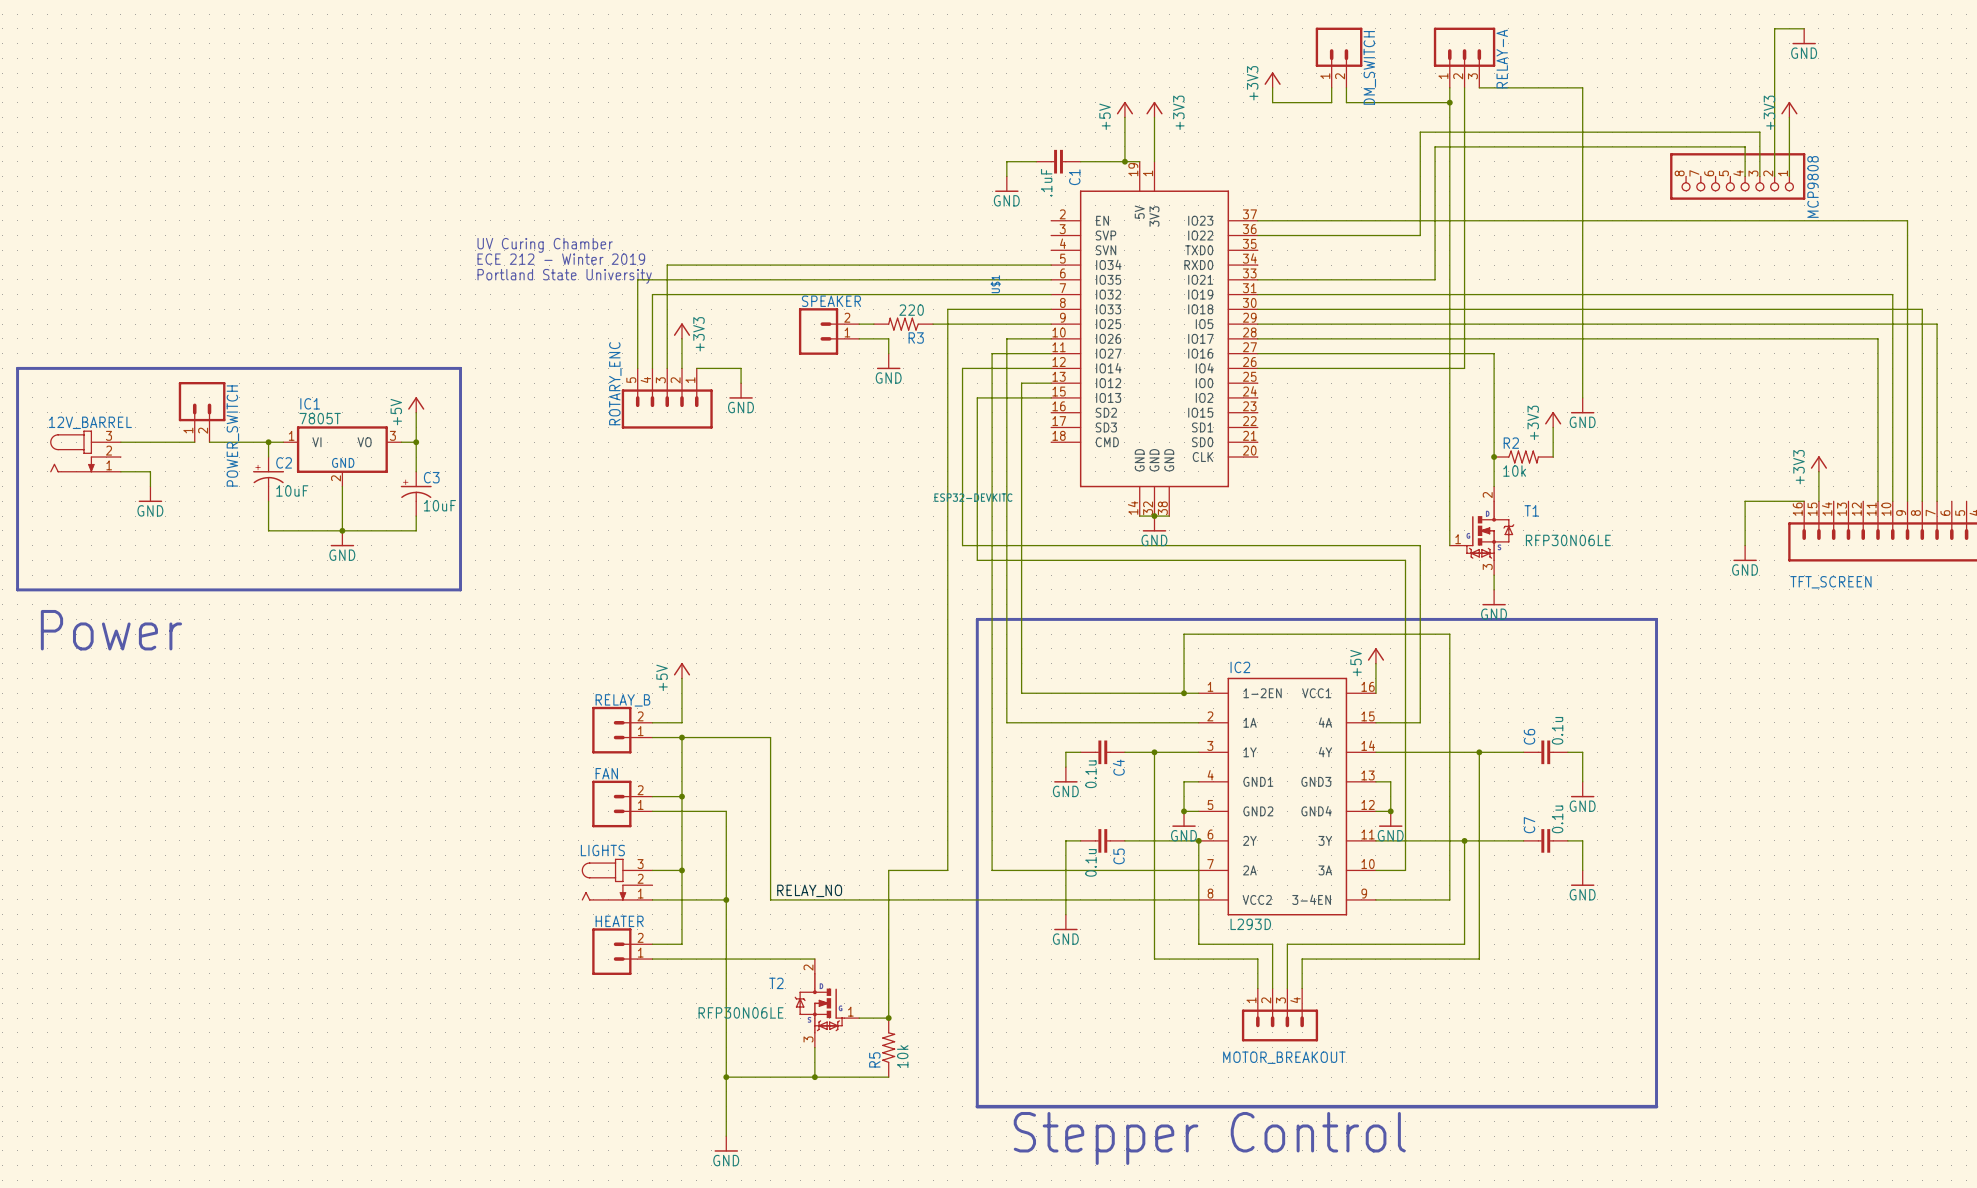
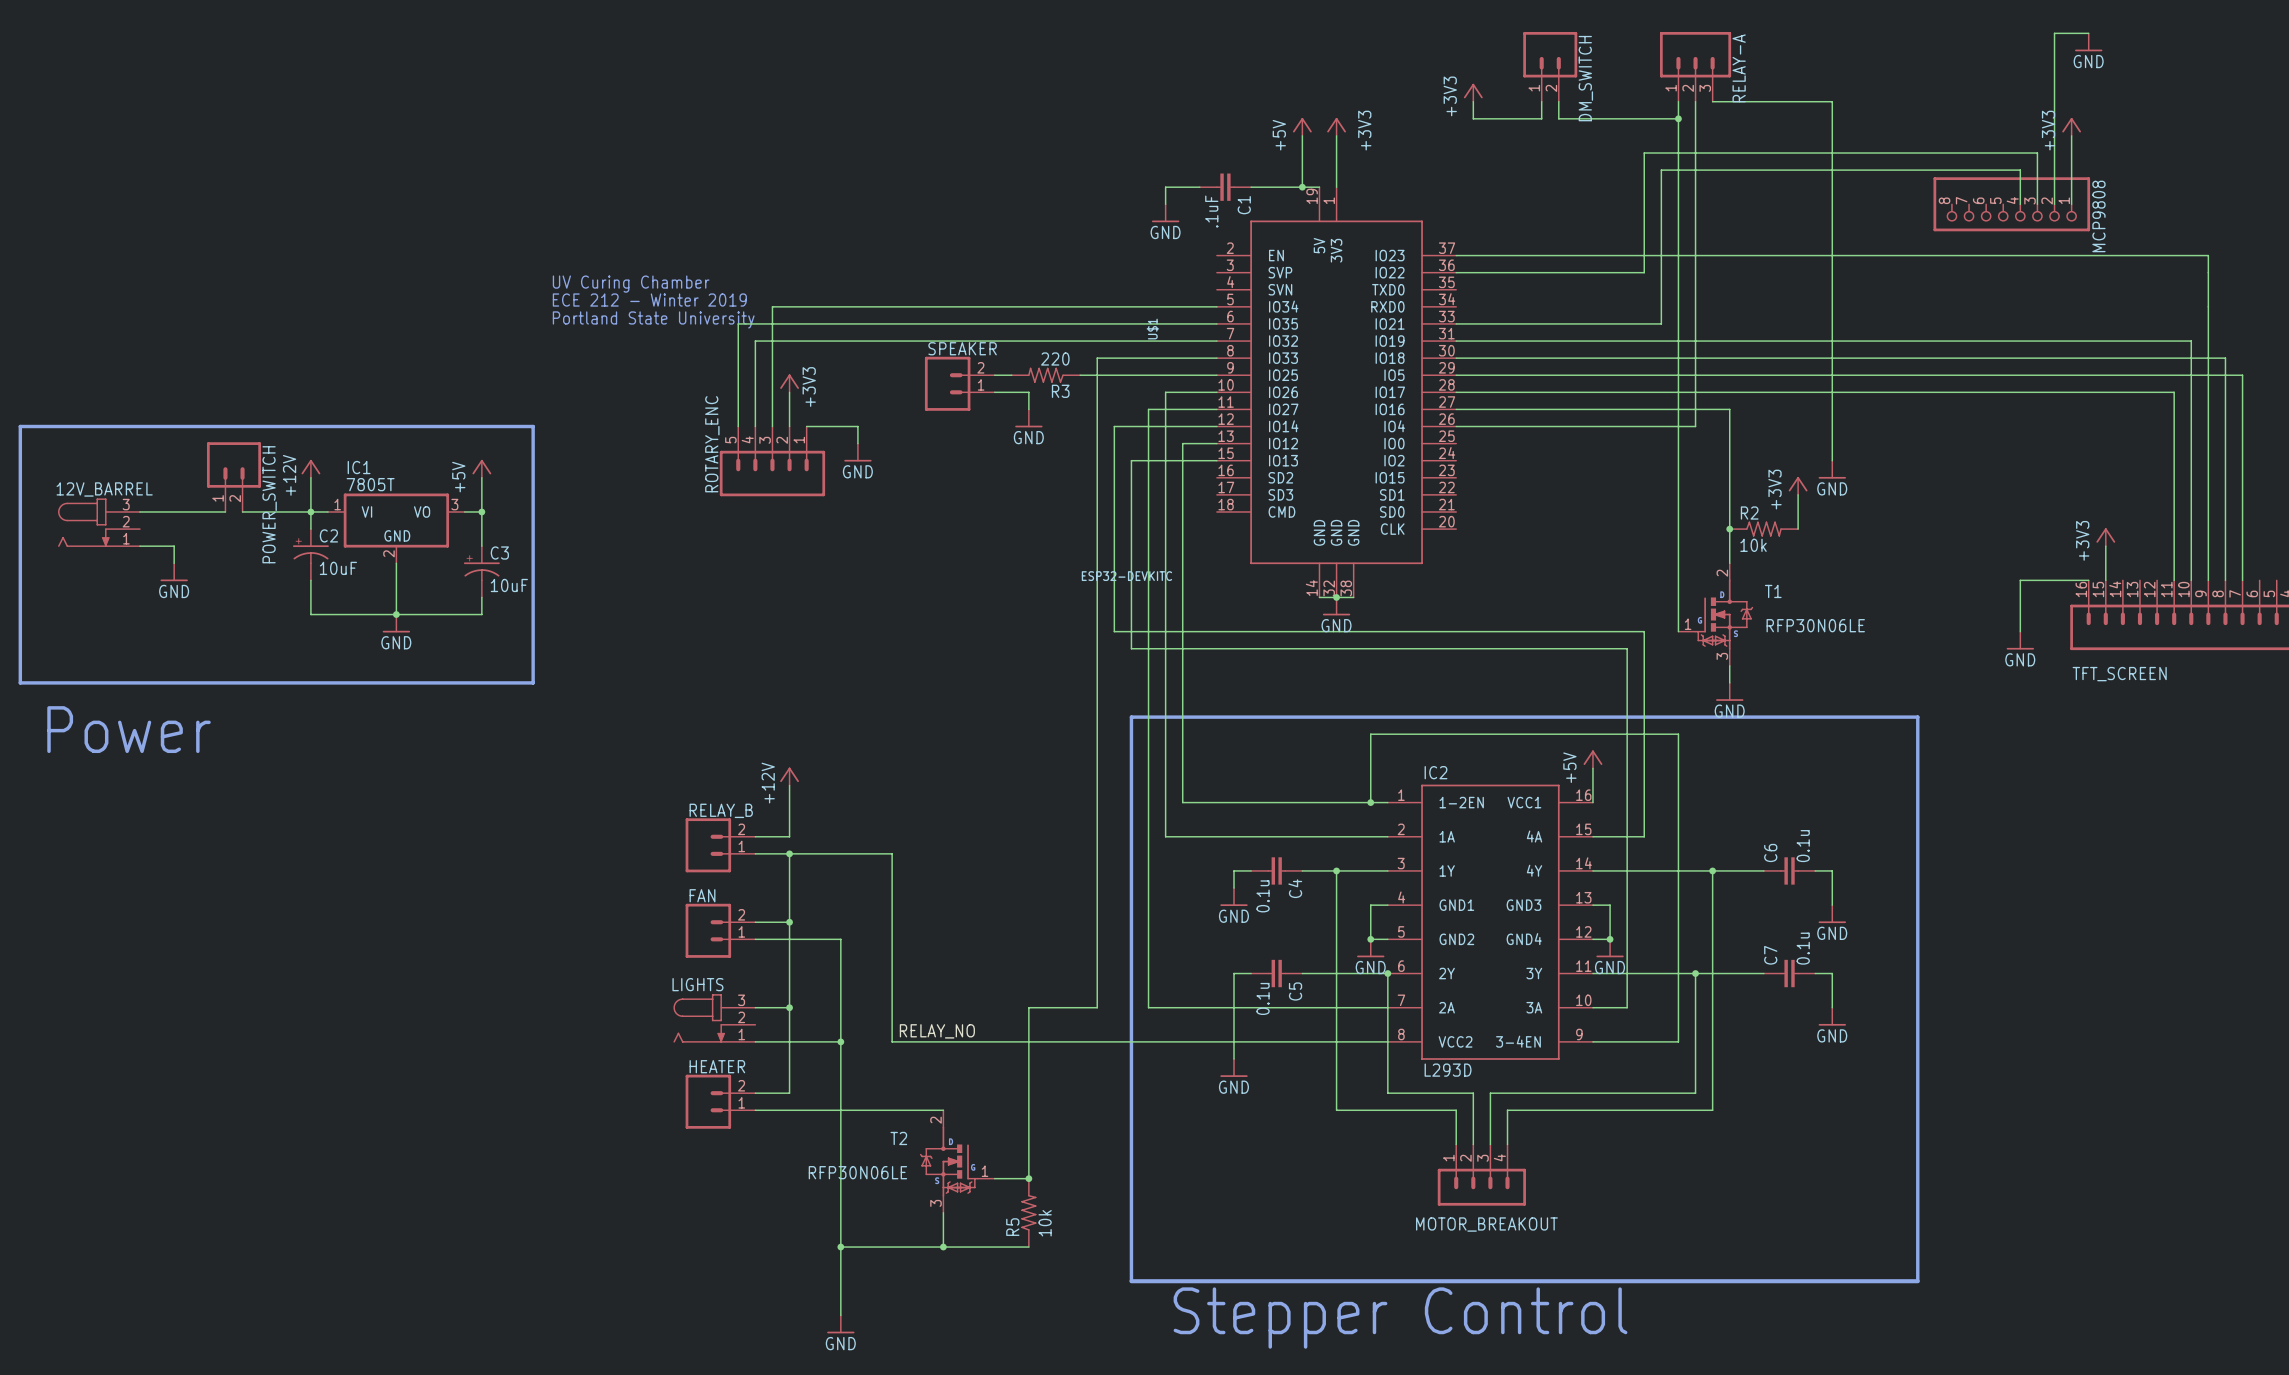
power symbol: none -> +12V (310, 468)
wire: none -> (310, 477) (310, 511)
power symbol: +5V (681, 670) -> +12V (789, 776)

